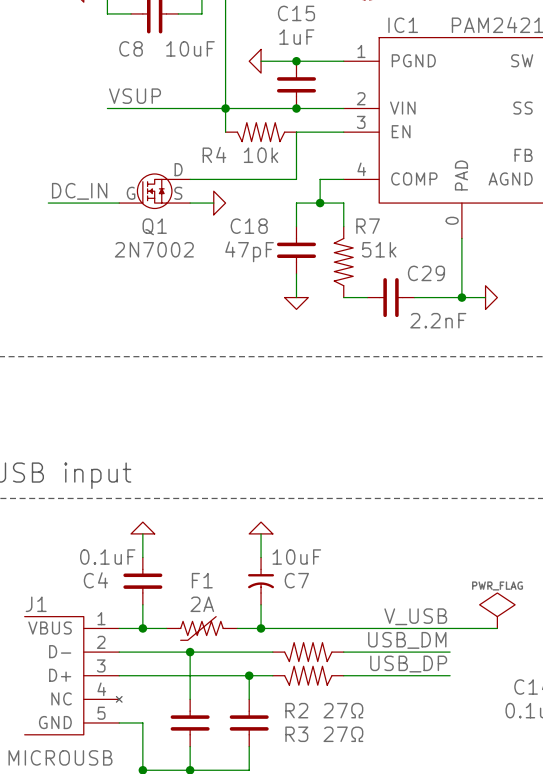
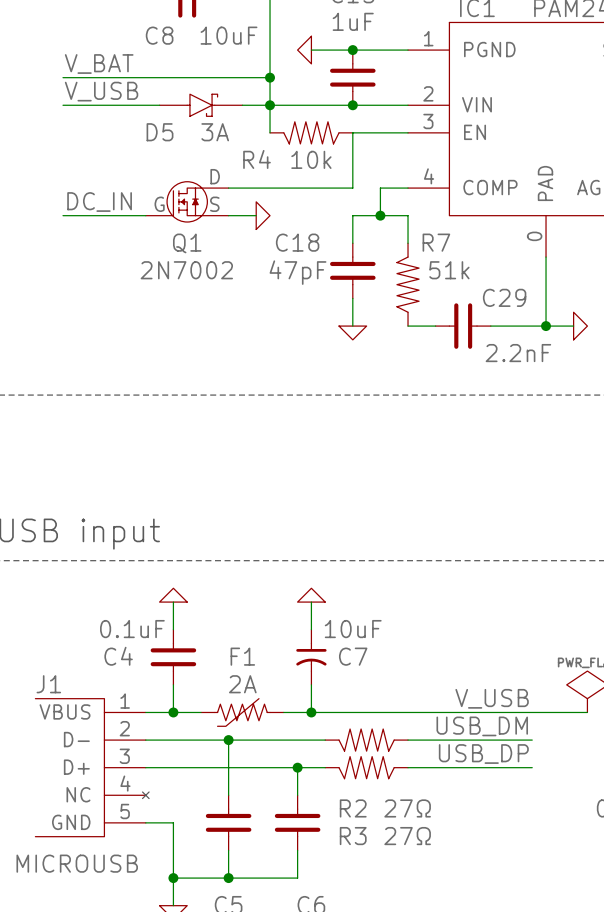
label: none -> V_BAT (99, 64)
wire: none -> (63, 77) (270, 77)
junction: none -> (270, 77)
label: none -> V_USB (101, 91)
label: VSUP (135, 96) -> none
wire: none -> (63, 105) (132, 105)
D5: none -> 3A (201, 105)

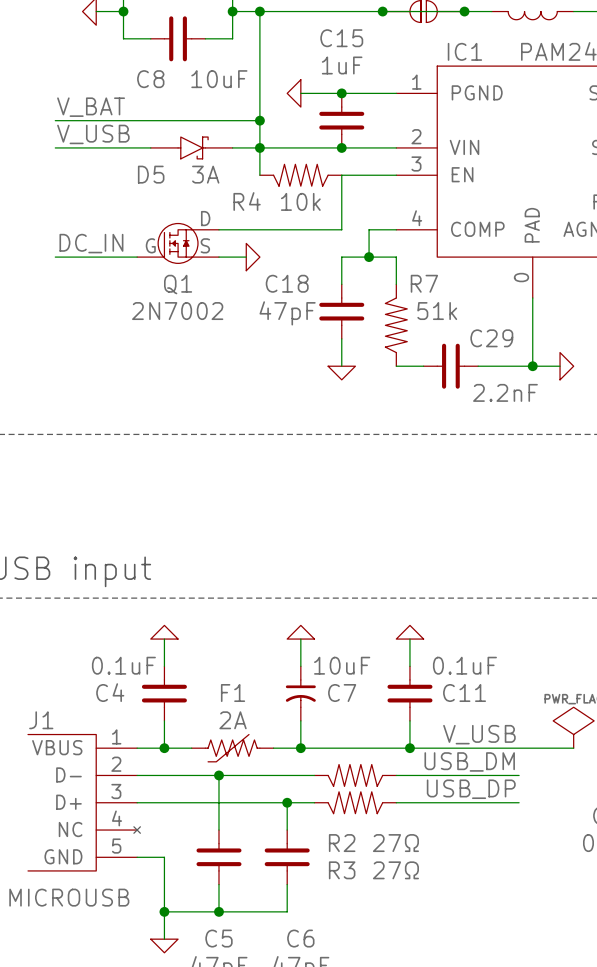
power symbol: none -> (409, 632)
wire: none -> (409, 639) (409, 666)
C11: none -> 0.1uF (409, 693)
wire: none -> (409, 720) (409, 748)
junction: none -> (409, 748)

